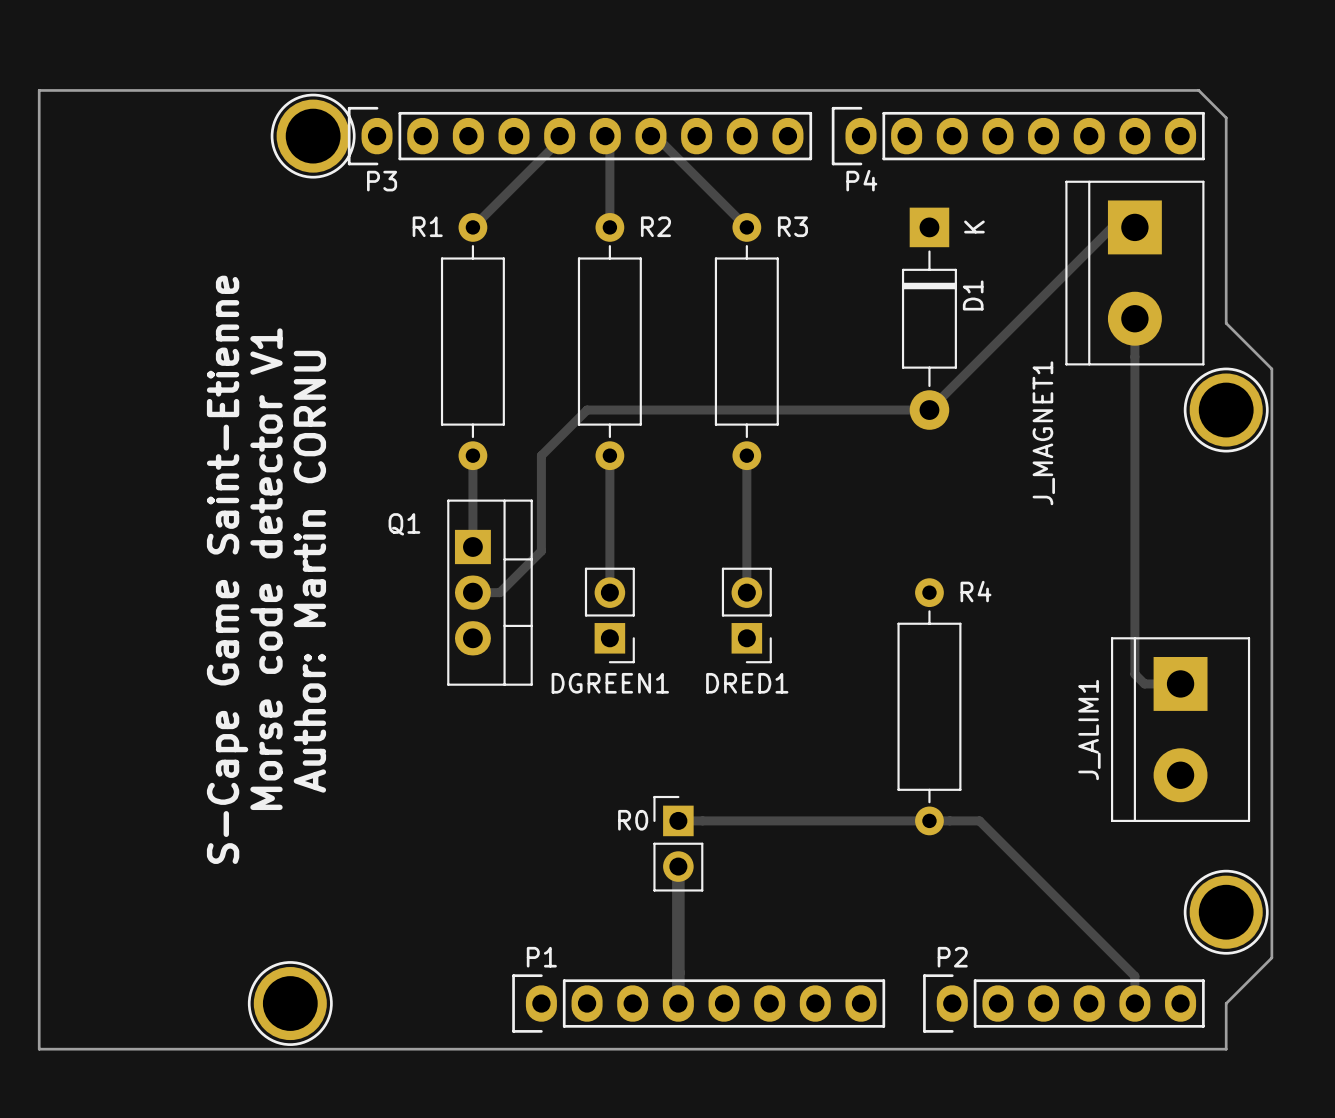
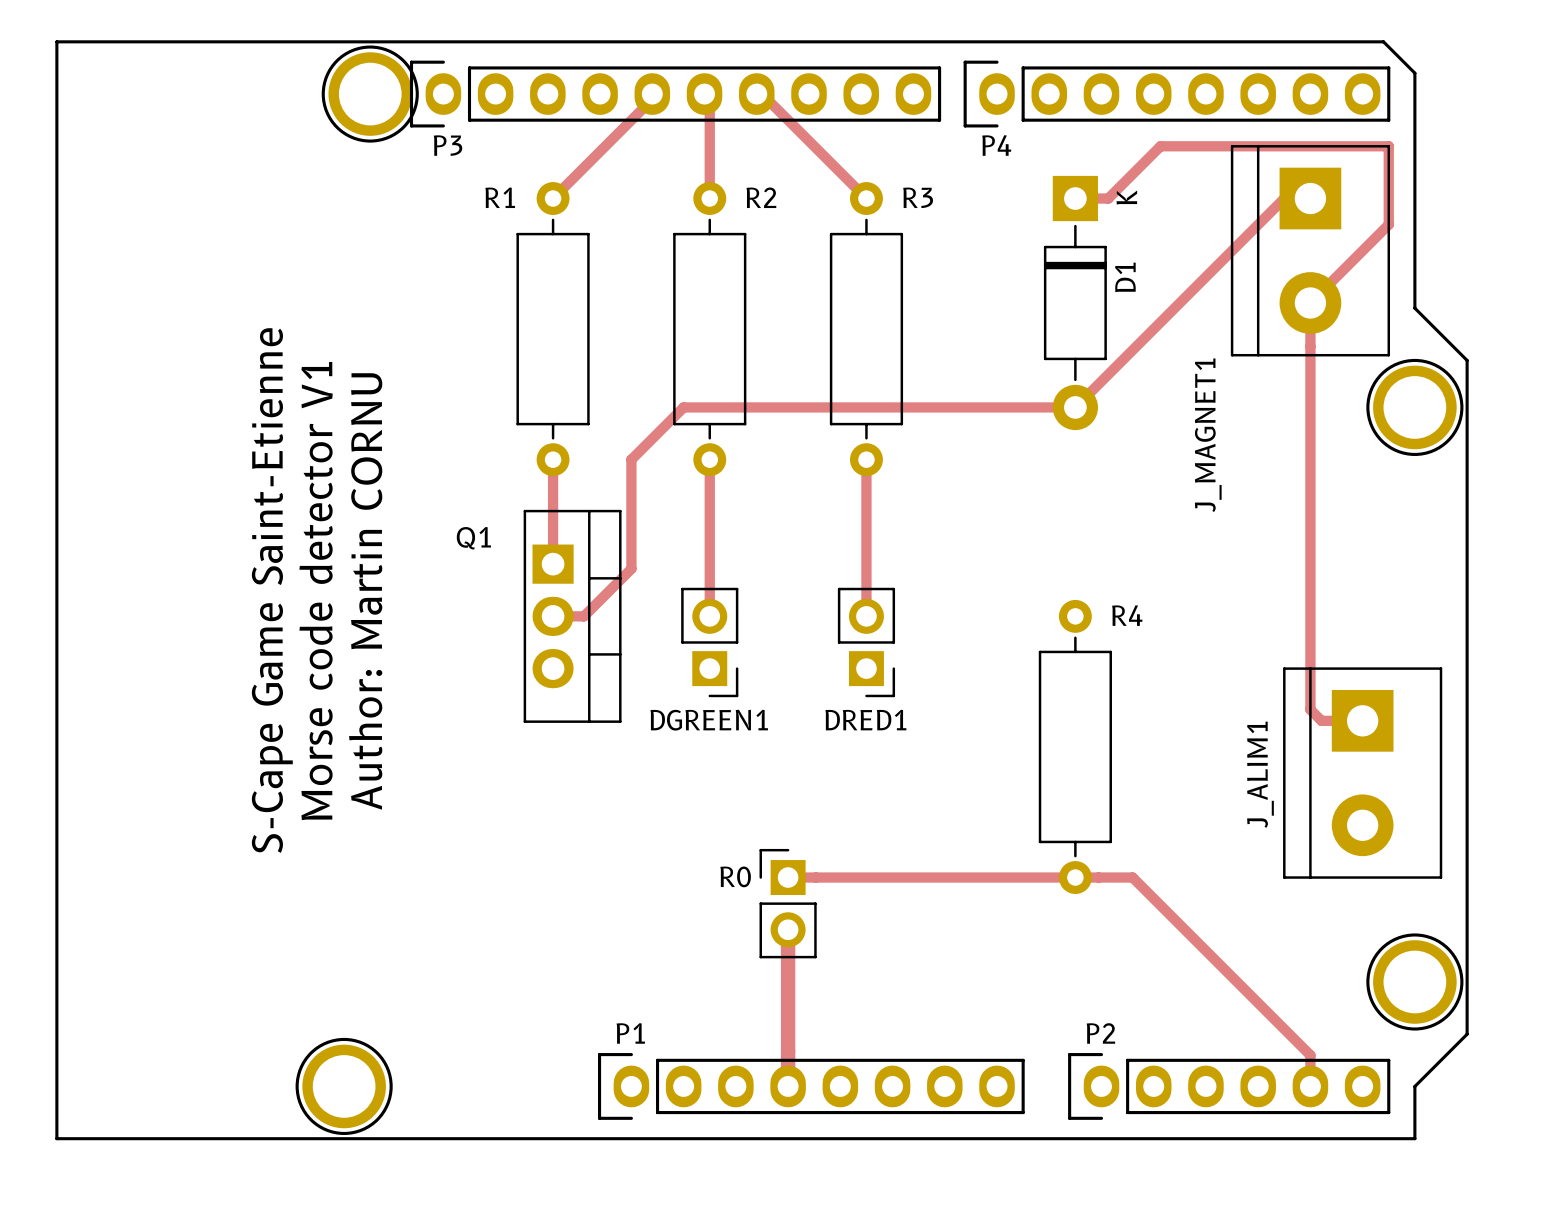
track: none -> (1075, 198) (1108, 198) (1160, 146) (1388, 146) (1388, 224) (1310, 302)

